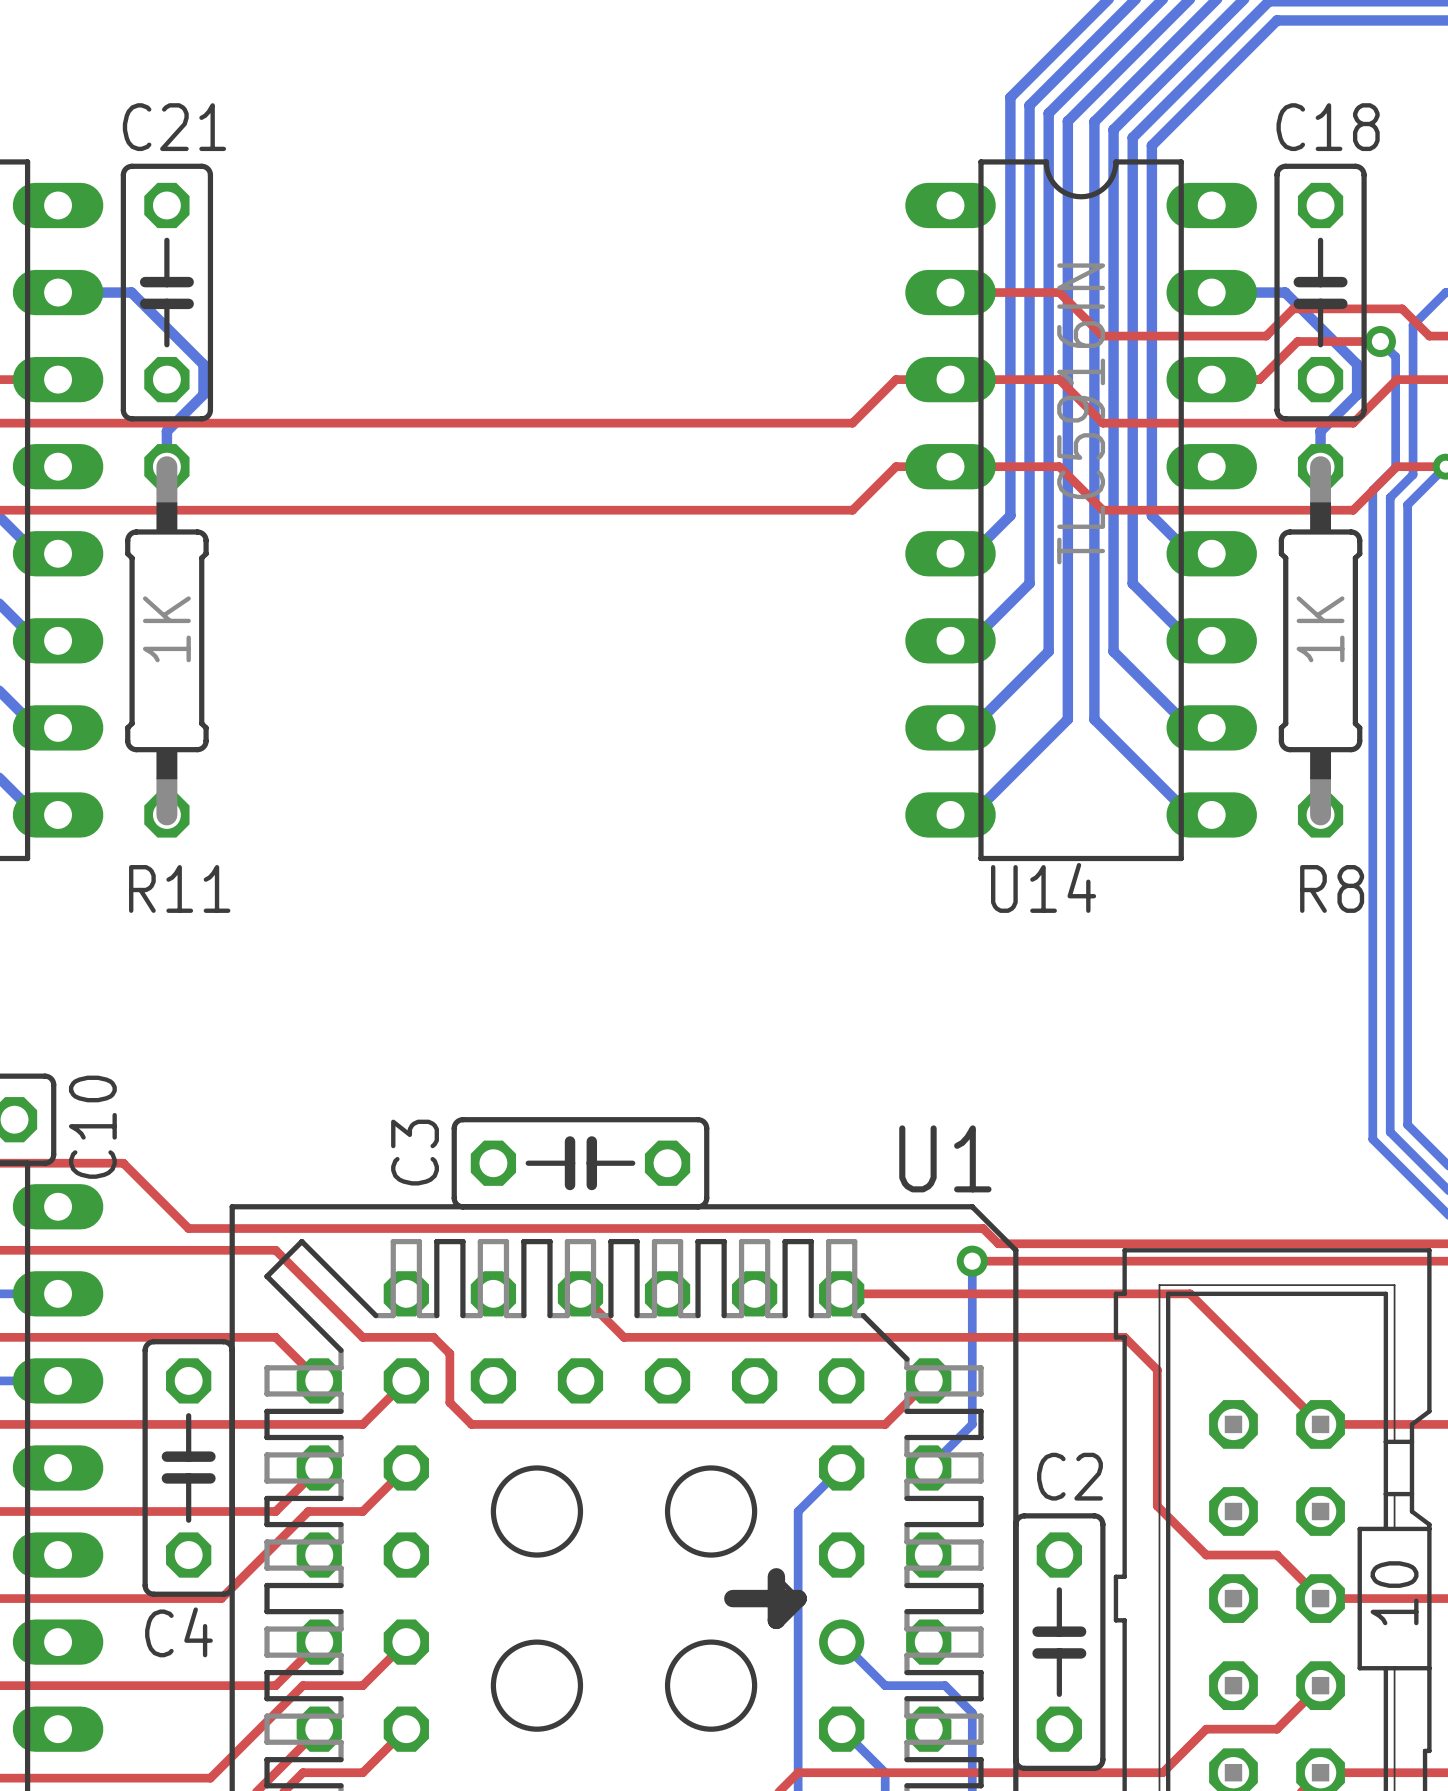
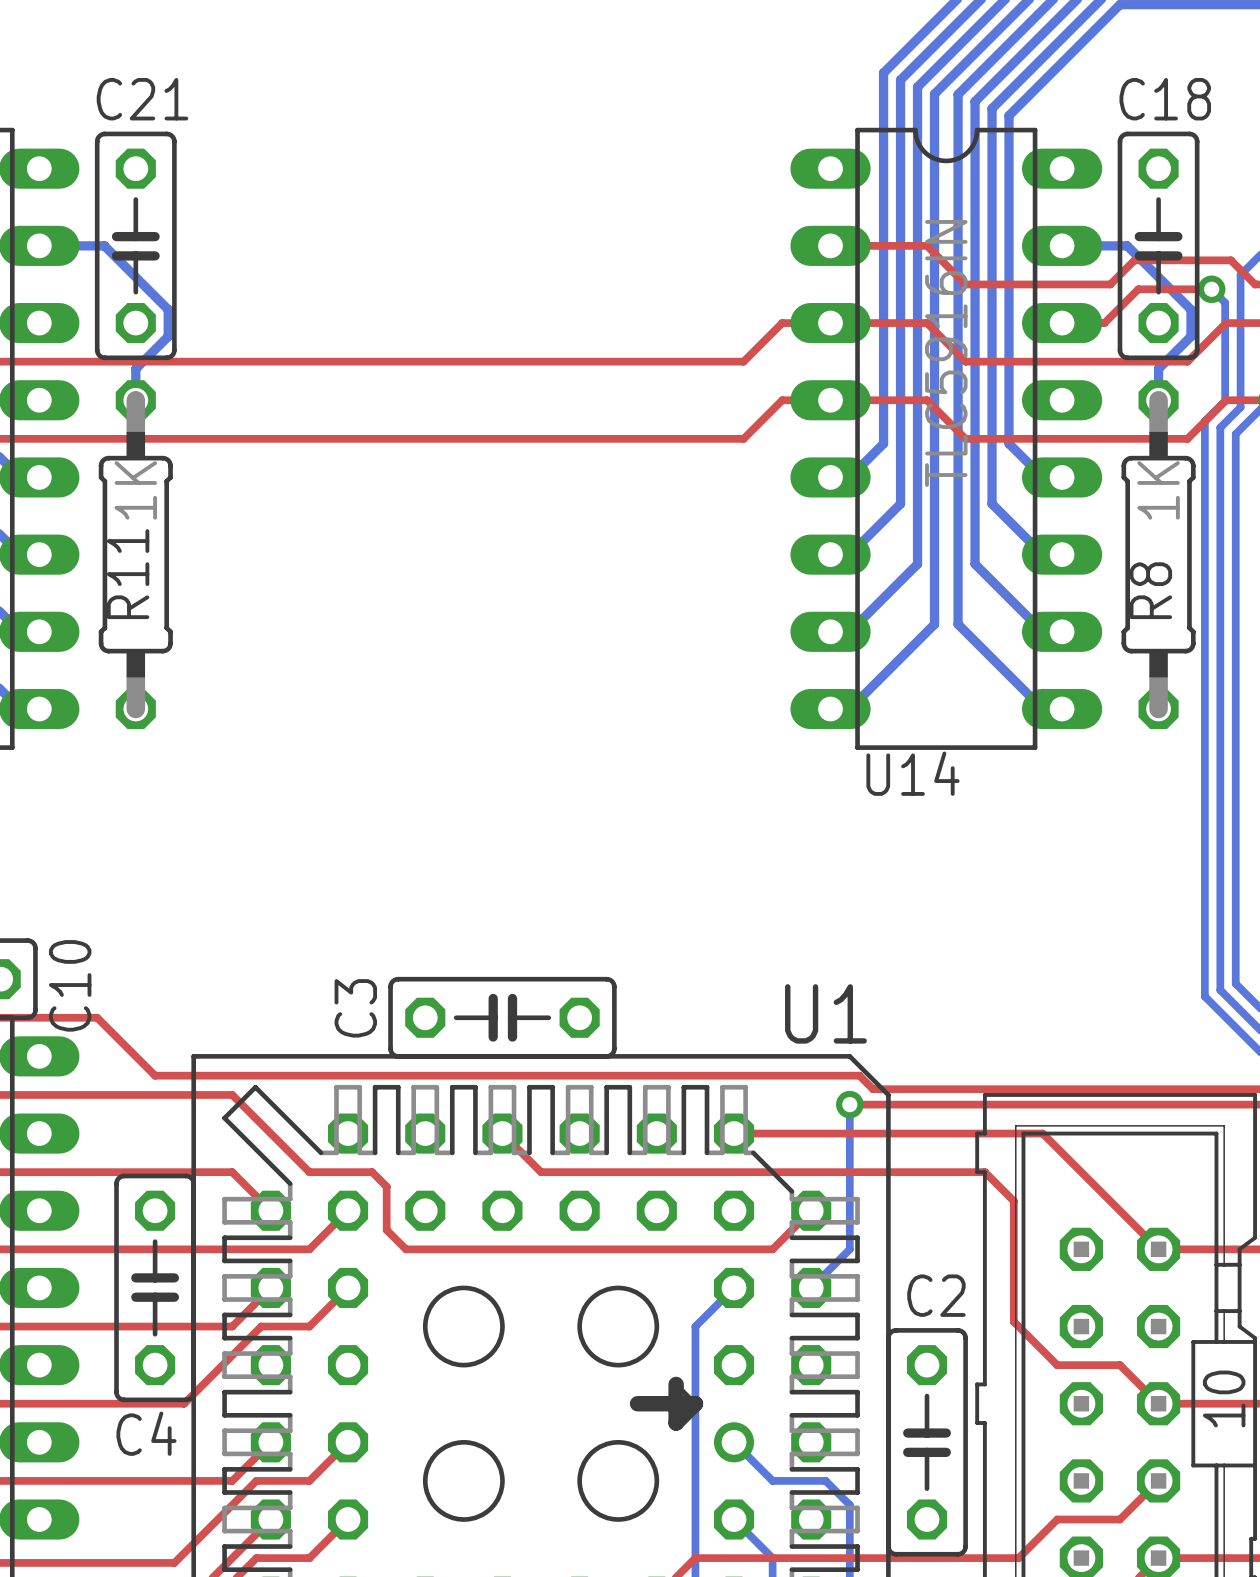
R11 value position: 1K (166, 629) -> 1K (135, 490)
R8 value position: 1K (1320, 629) -> 1K (1158, 490)
R11 name rotation: 0° (179, 888) -> 90° counterclockwise (128, 574)
R11 name position: R11 (179, 888) -> R11 (128, 574)
R8 name rotation: 0° (1332, 888) -> 90° counterclockwise (1150, 590)
R8 name position: R8 (1332, 888) -> R8 (1150, 590)

